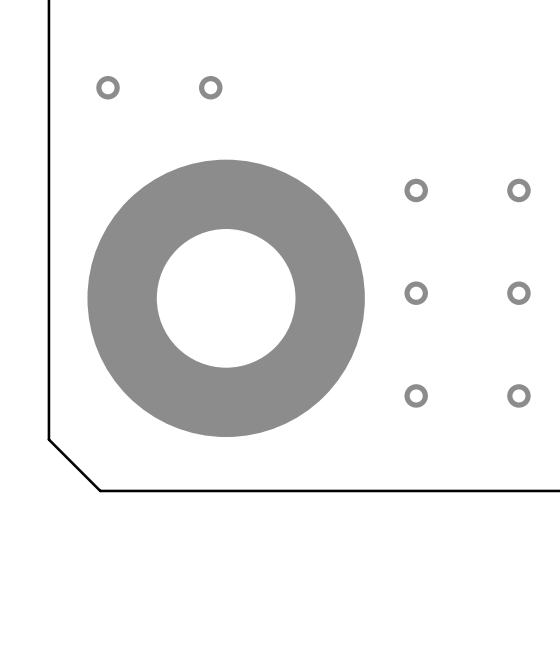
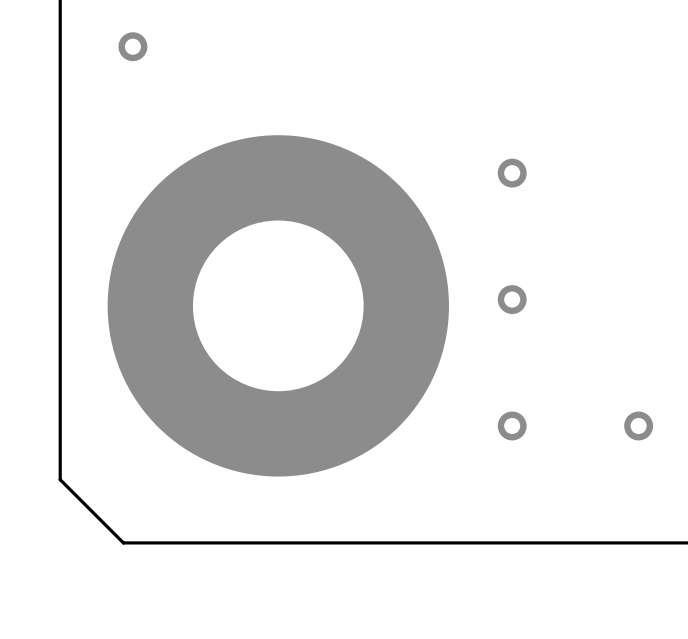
via: (210, 87) -> none
via: (518, 190) -> none
via: (518, 293) -> none

